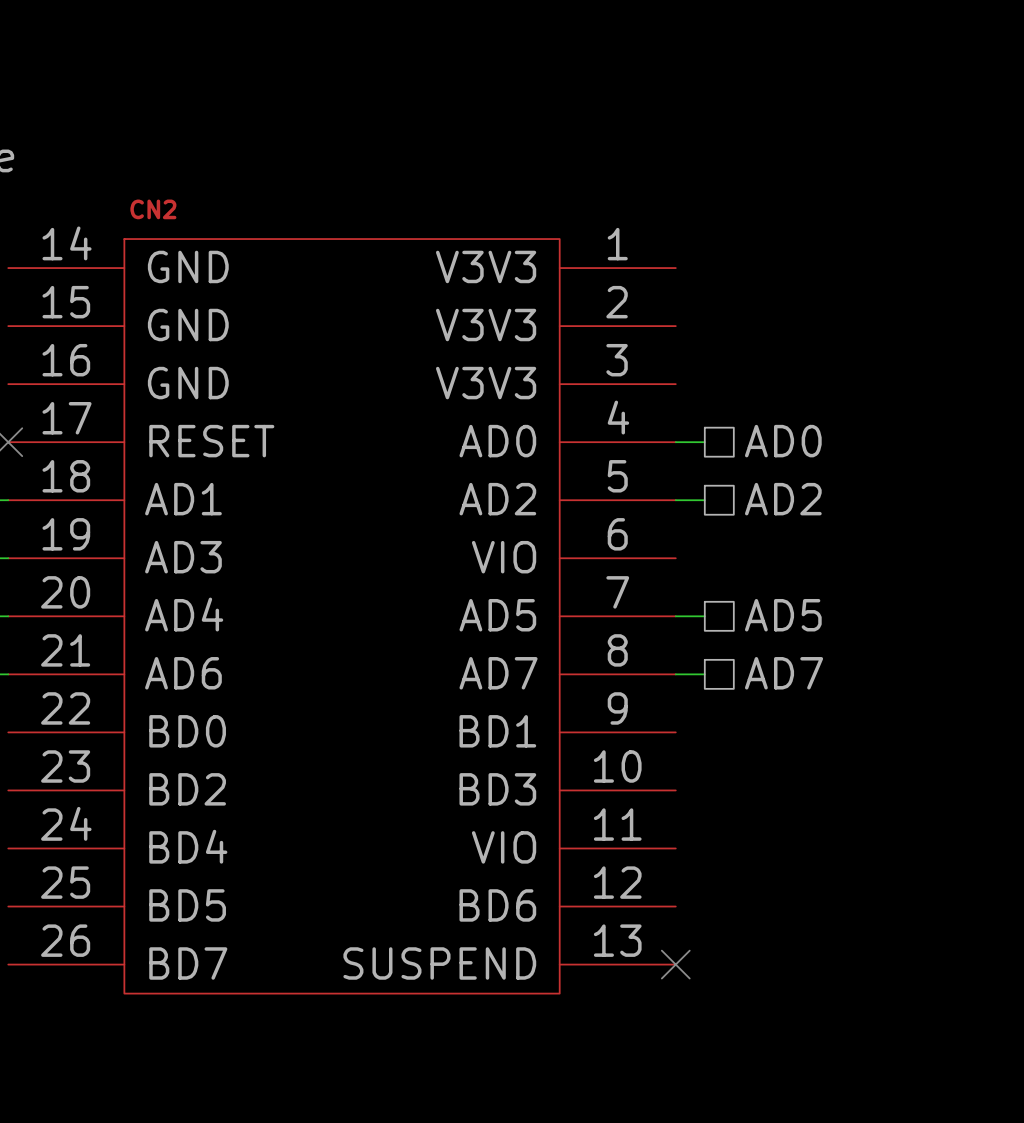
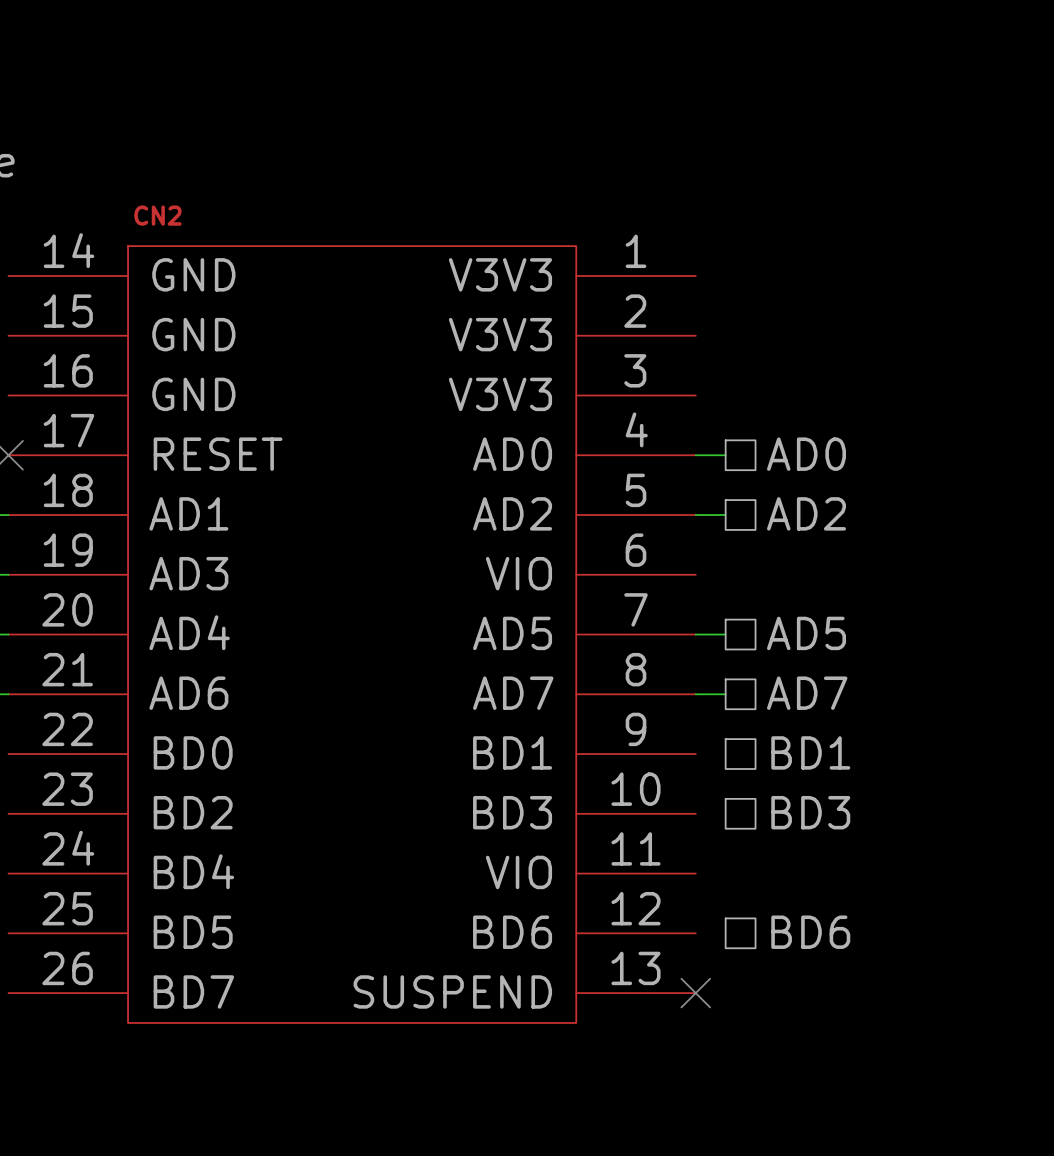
hierarchical label: none -> BD1 (810, 752)
hierarchical label: none -> BD3 (810, 812)
hierarchical label: none -> BD6 (810, 932)

